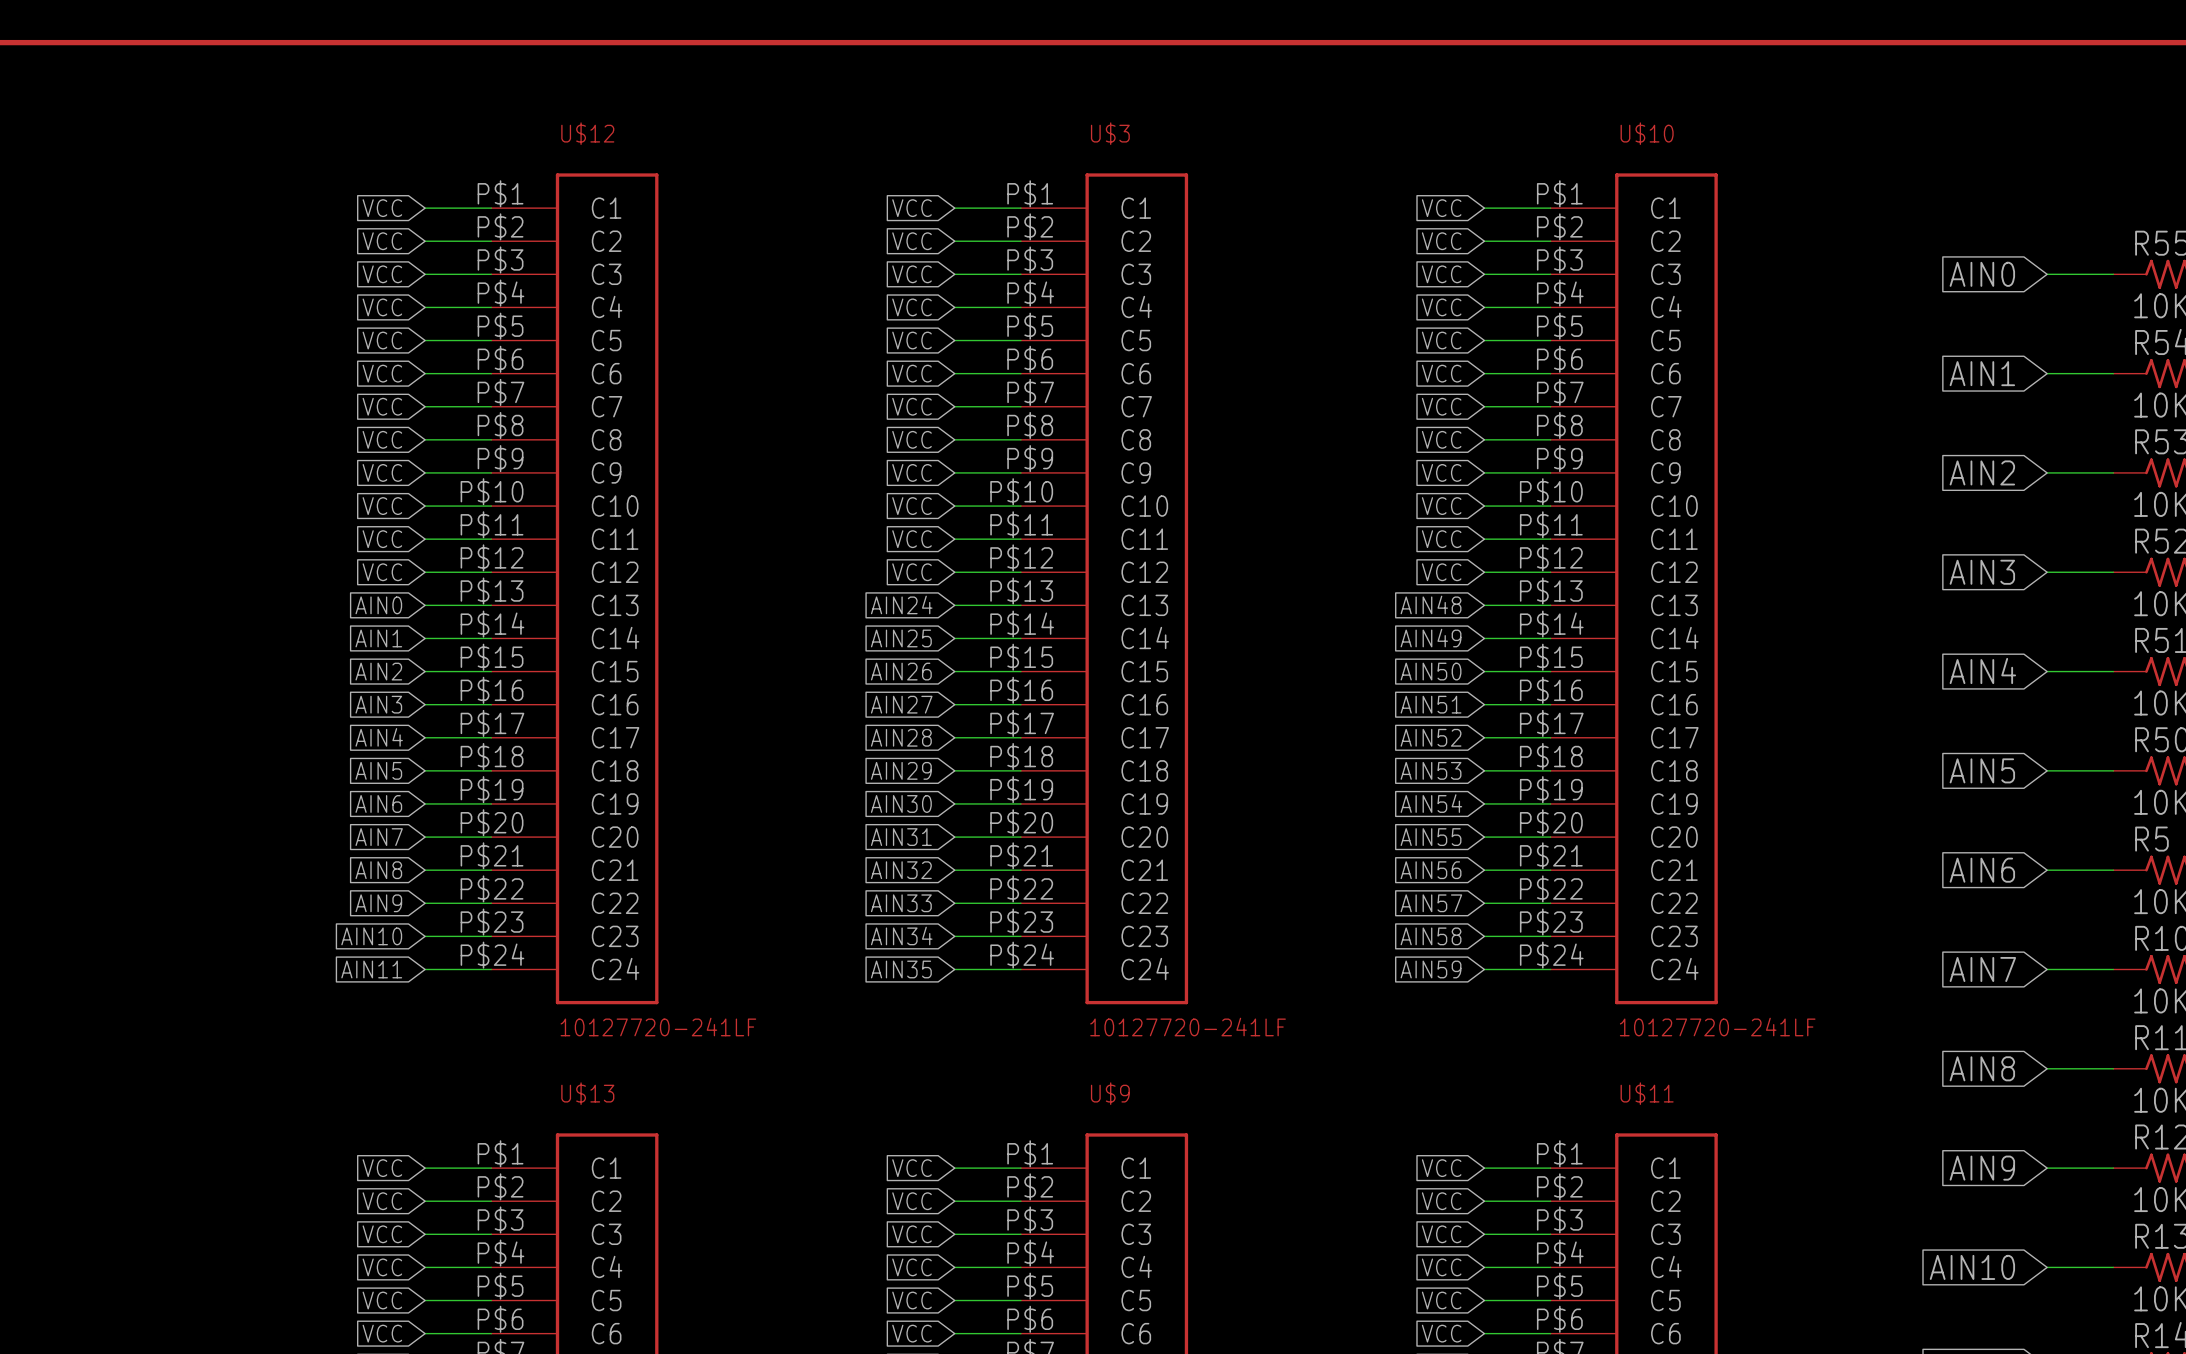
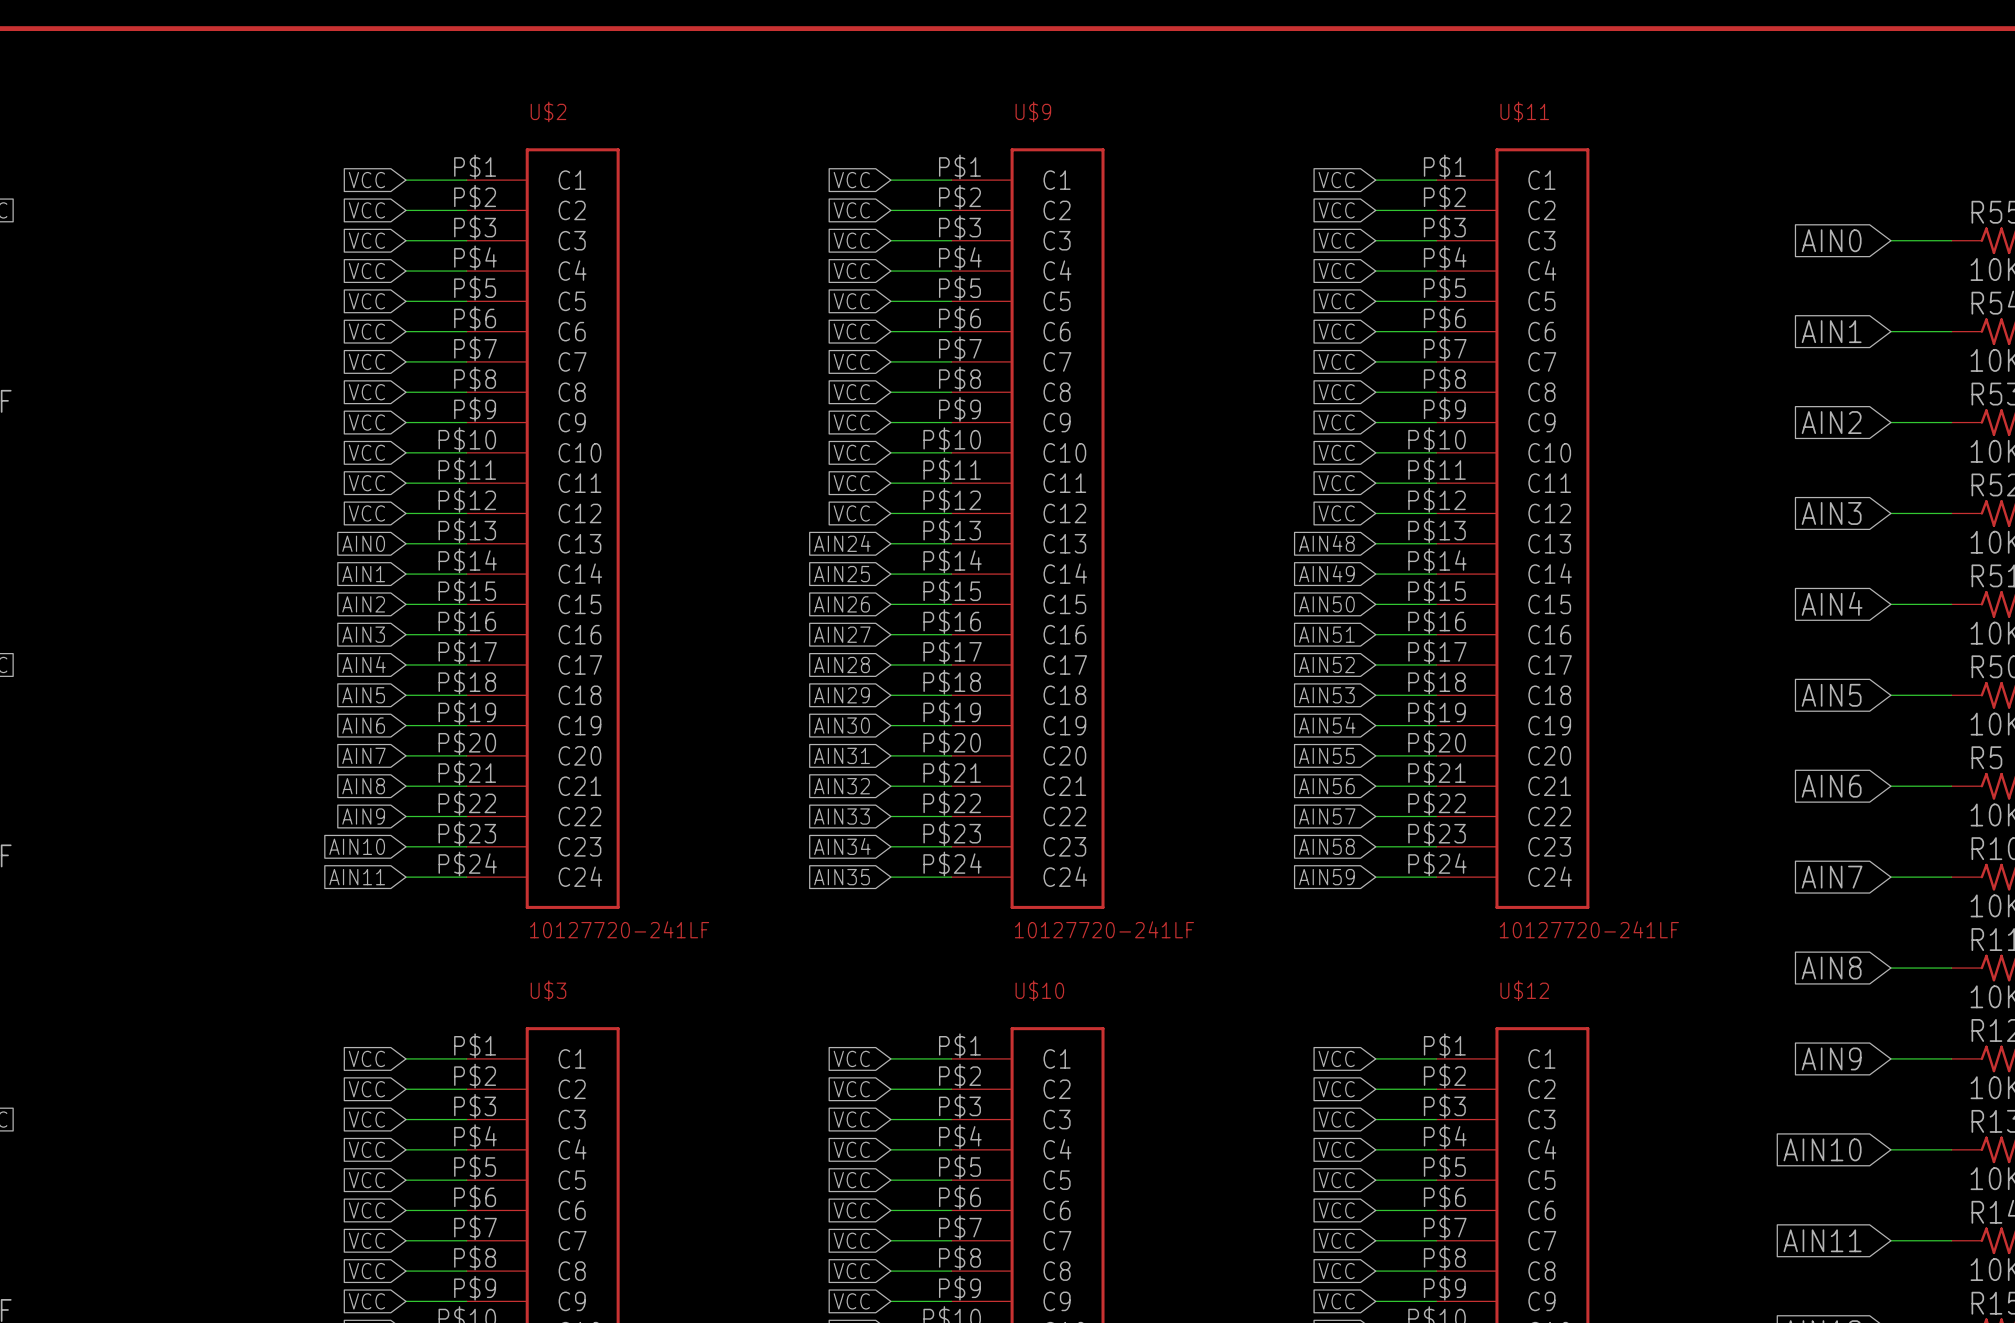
U$12 name: U$12 (587, 133) -> U$2 (548, 111)
U$3 name: U$3 (1110, 133) -> U$9 (1033, 111)
U$10 name: U$10 (1647, 133) -> U$11 (1524, 111)
U$13 name: U$13 (587, 1093) -> U$3 (548, 990)
U$9 name: U$9 (1110, 1093) -> U$10 (1039, 990)
U$11 name: U$11 (1647, 1093) -> U$12 (1524, 990)

